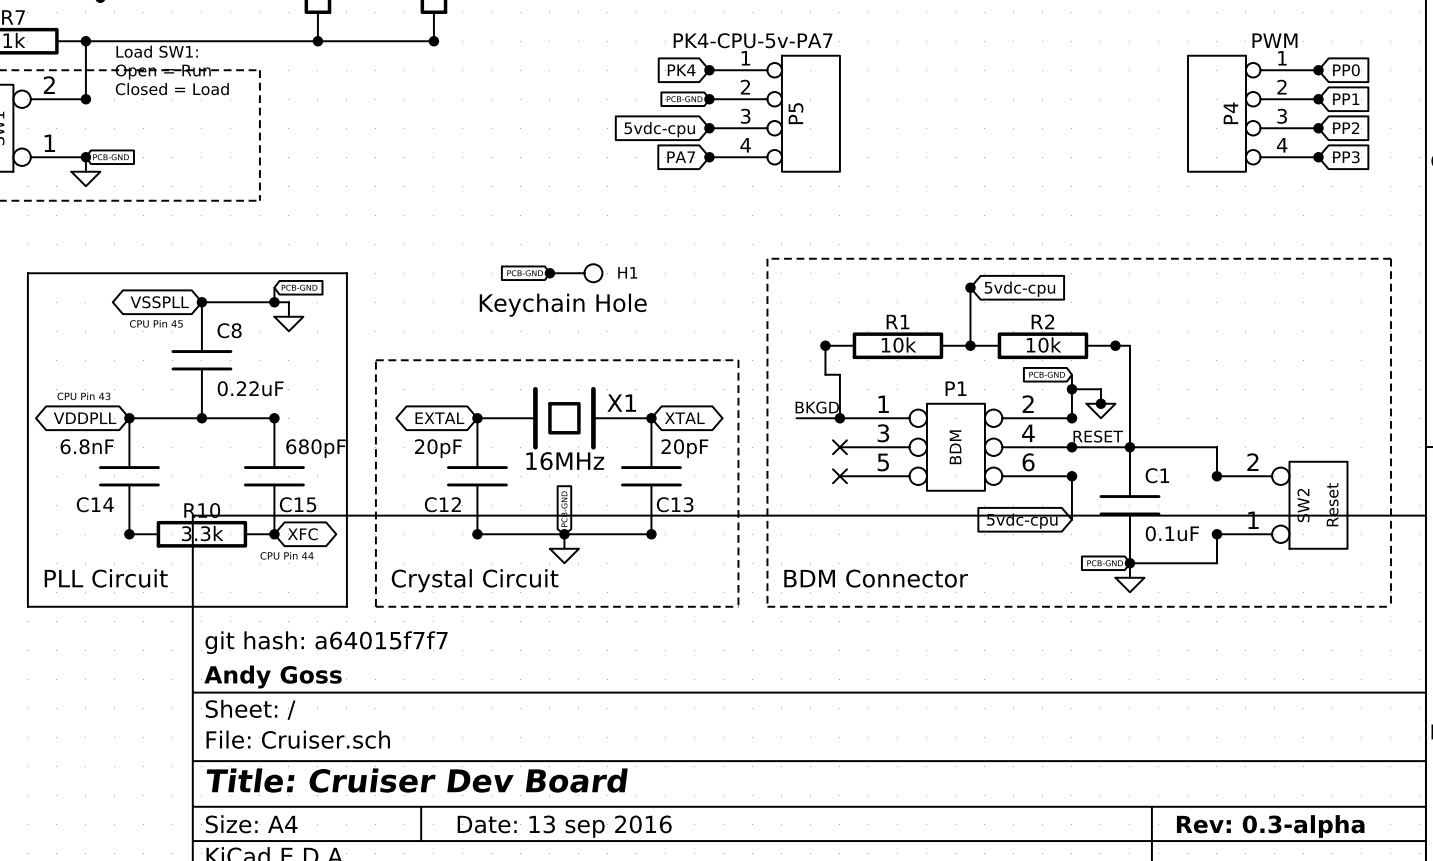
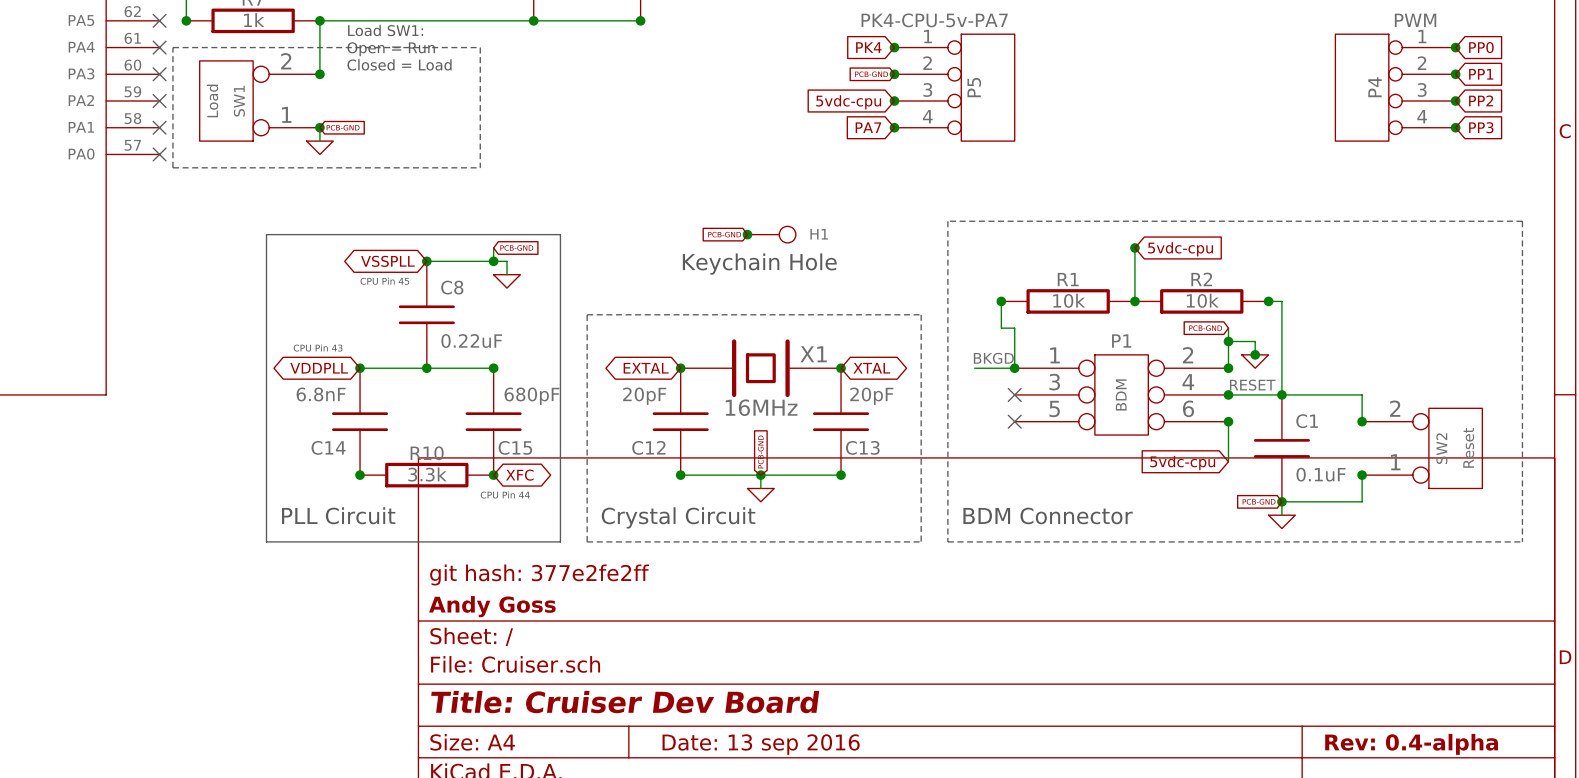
title block: git hash: a64015f7f7 (326, 642) -> git hash: 377e2fe2ff (539, 575)
title block: Rev: 0.3-alpha (1270, 826) -> Rev: 0.4-alpha (1411, 744)

